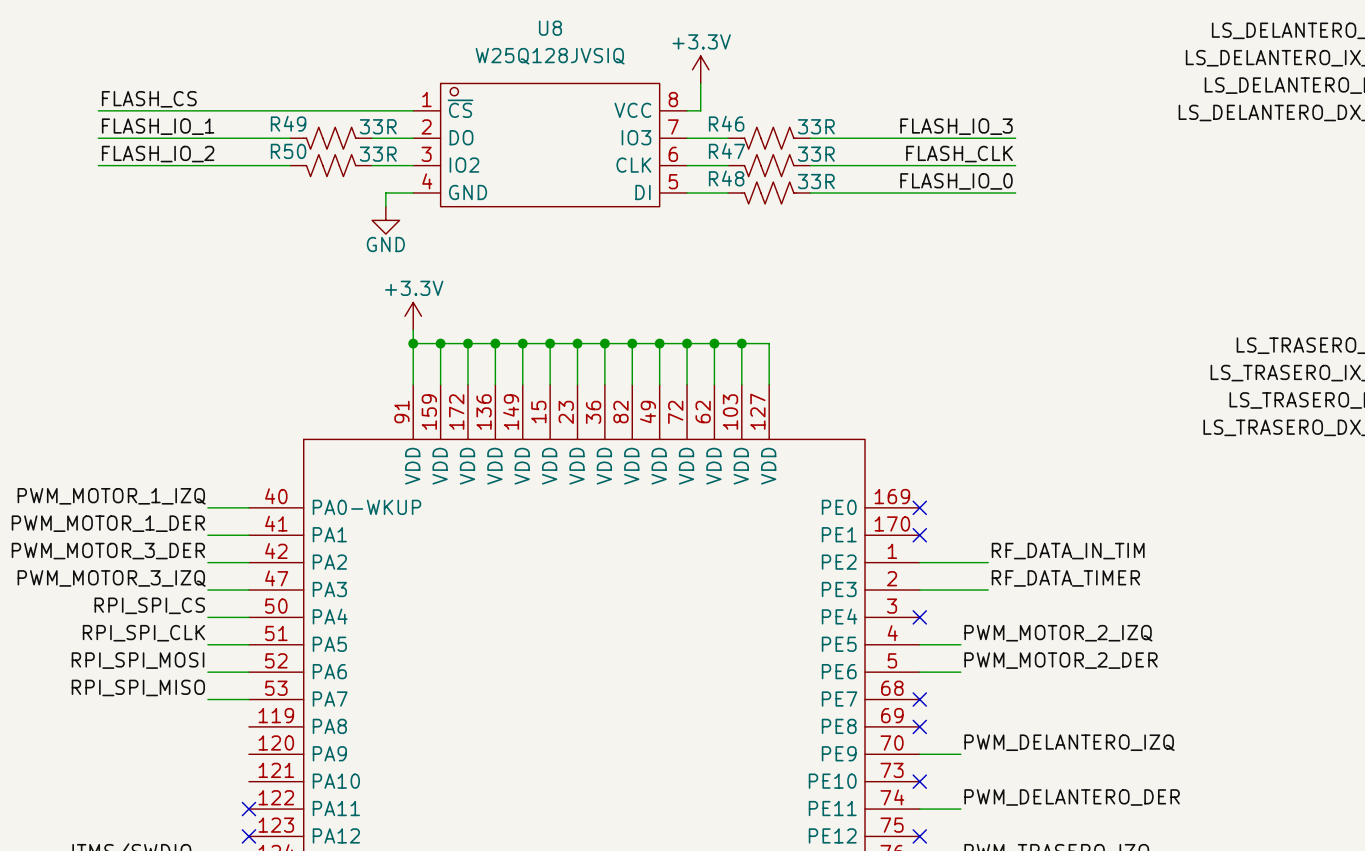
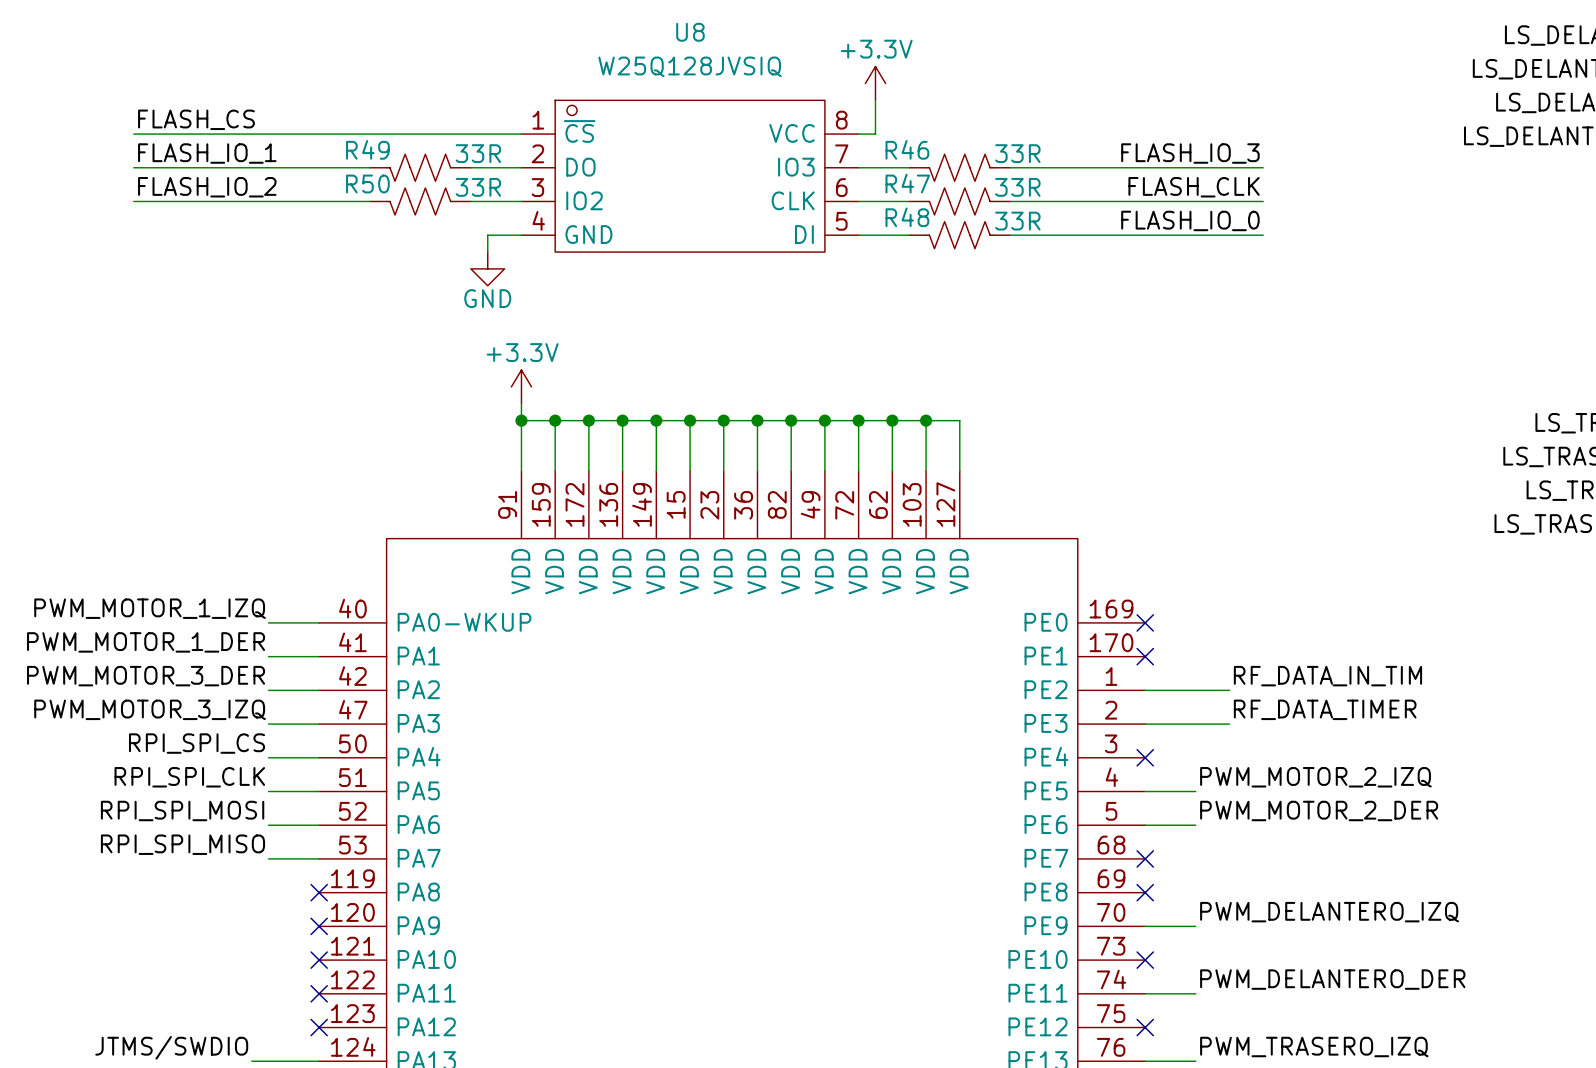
no-connect mark: none -> (319, 892)
no-connect mark: none -> (319, 926)
no-connect mark: none -> (319, 960)

